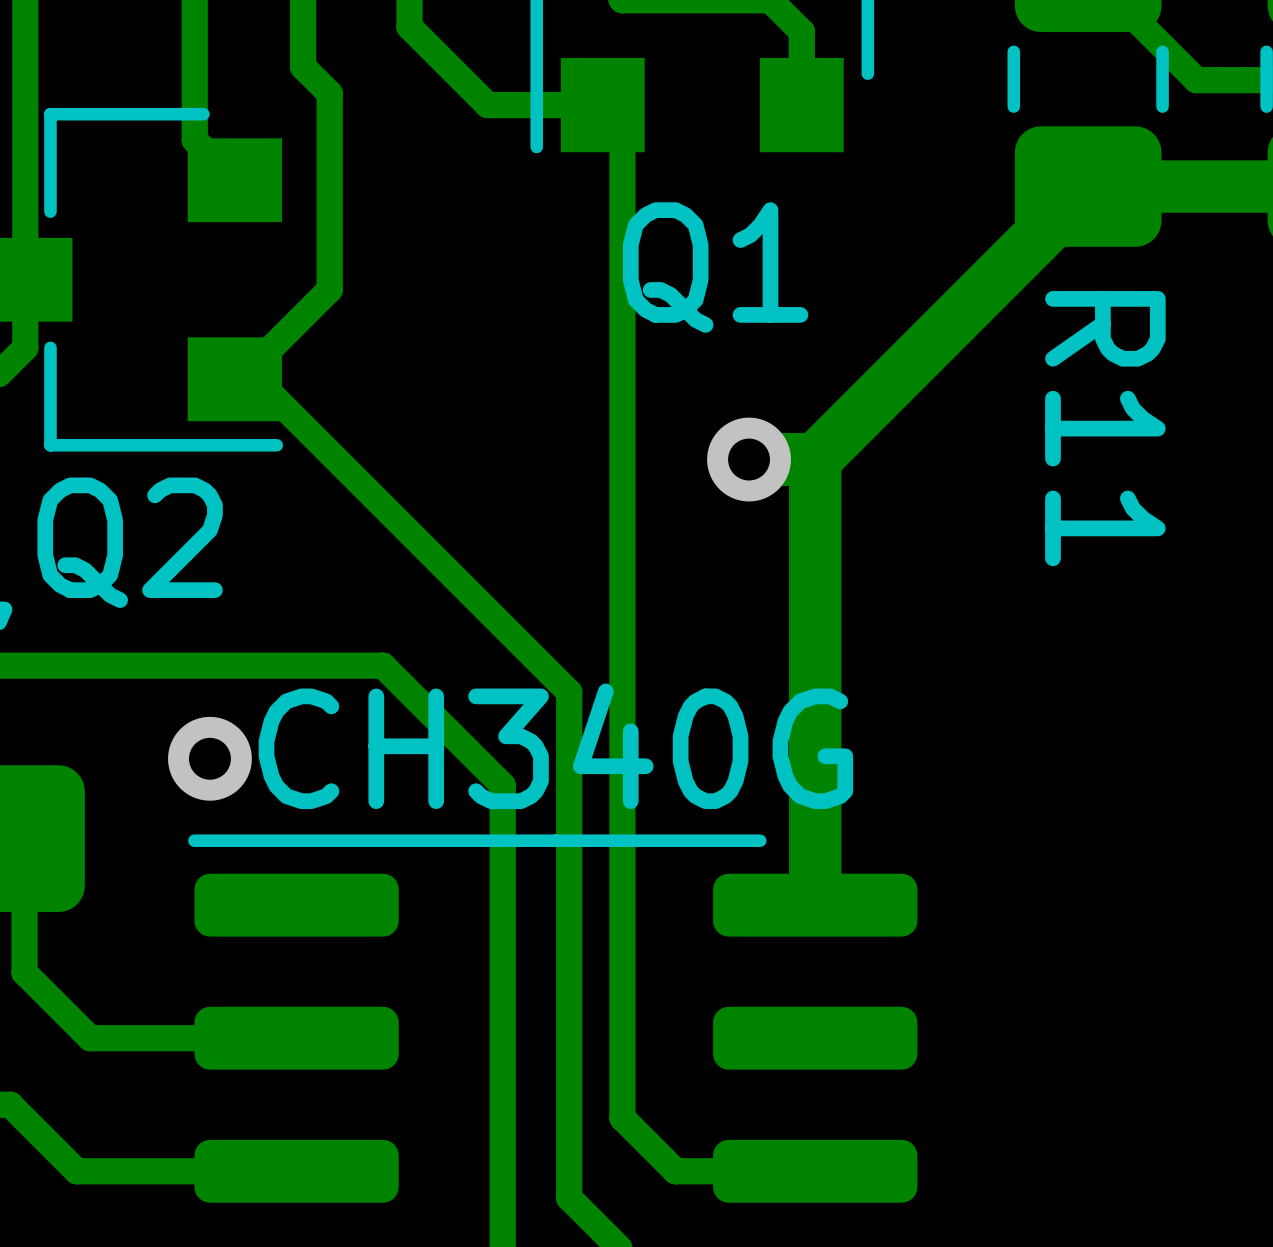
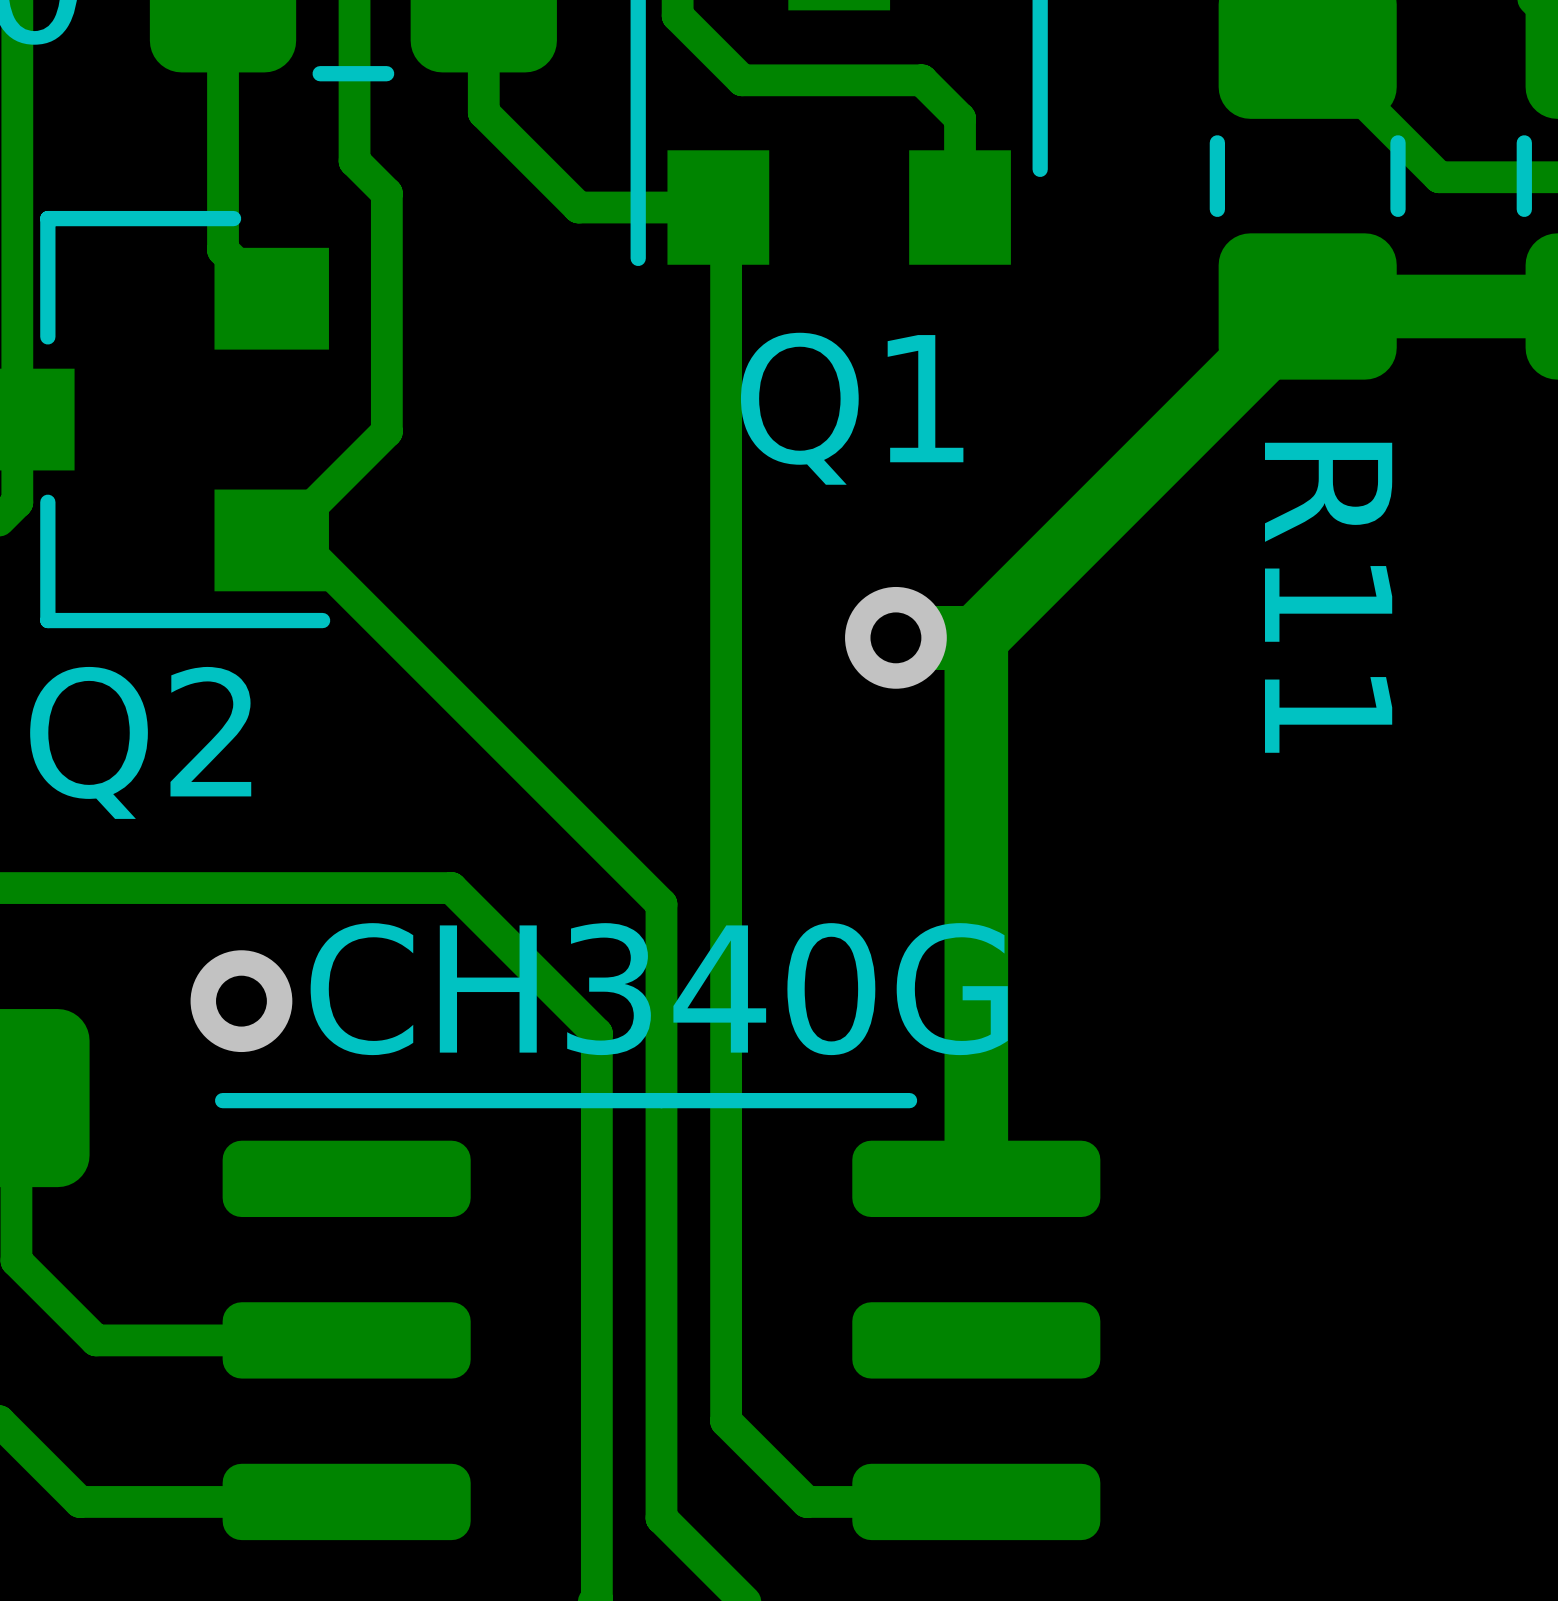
track: (609, 111) (622, 124) (622, 1118) -> (726, 215) (726, 1421) (742, 1437)
track: (555, 678) (569, 692) (569, 1197) -> (661, 904) (661, 1518) (677, 1534)

